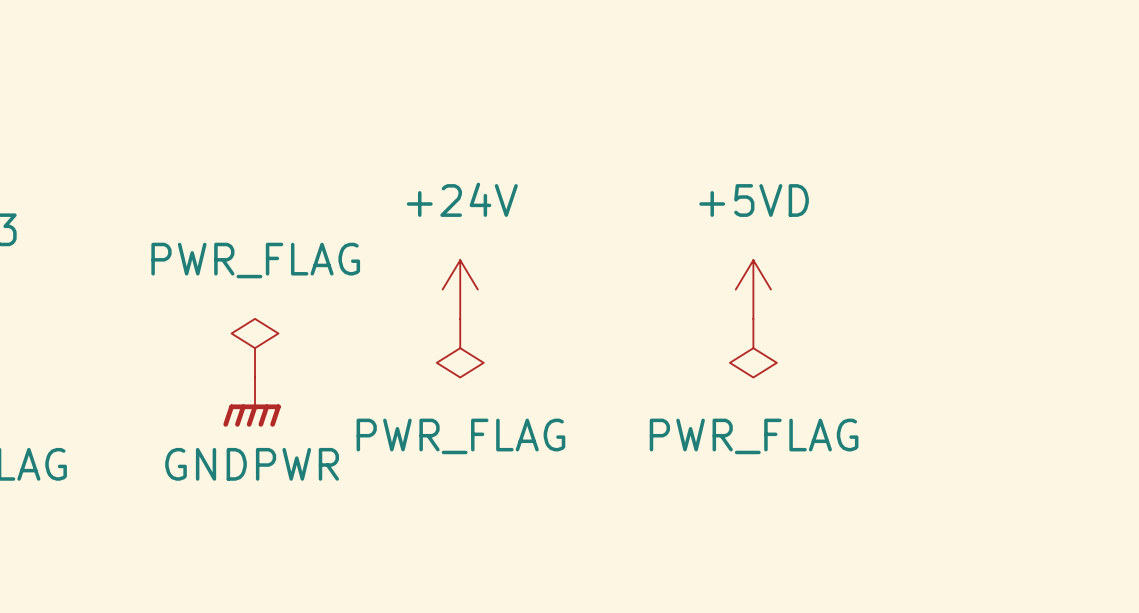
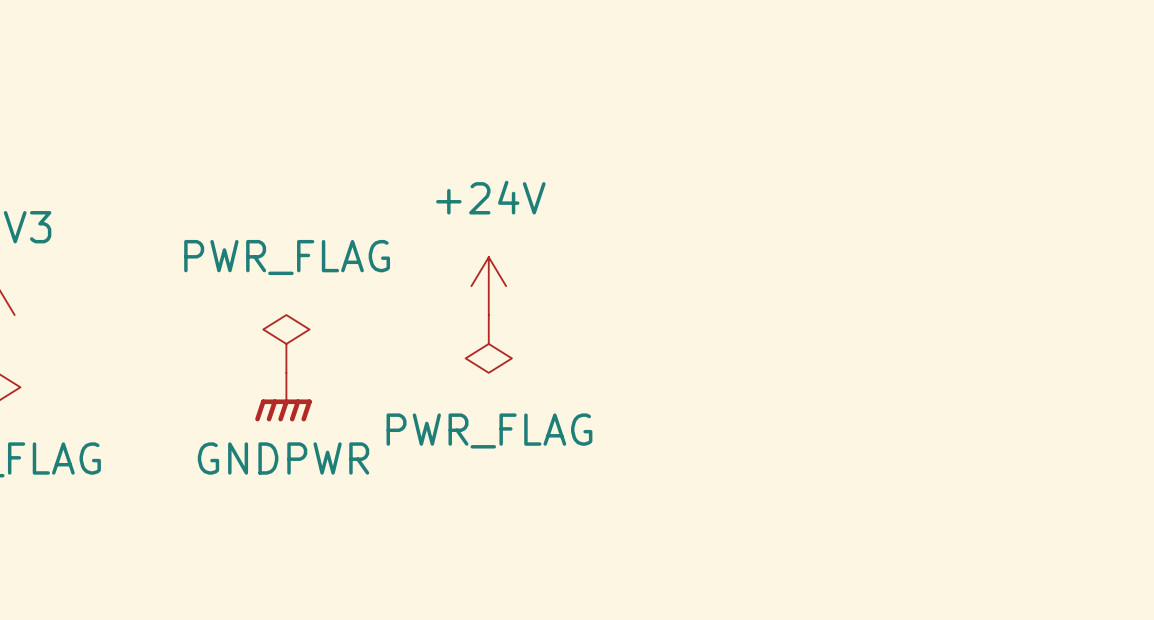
power symbol: +5VD (753, 289) -> none
power symbol: PWR_FLAG (753, 348) -> none

